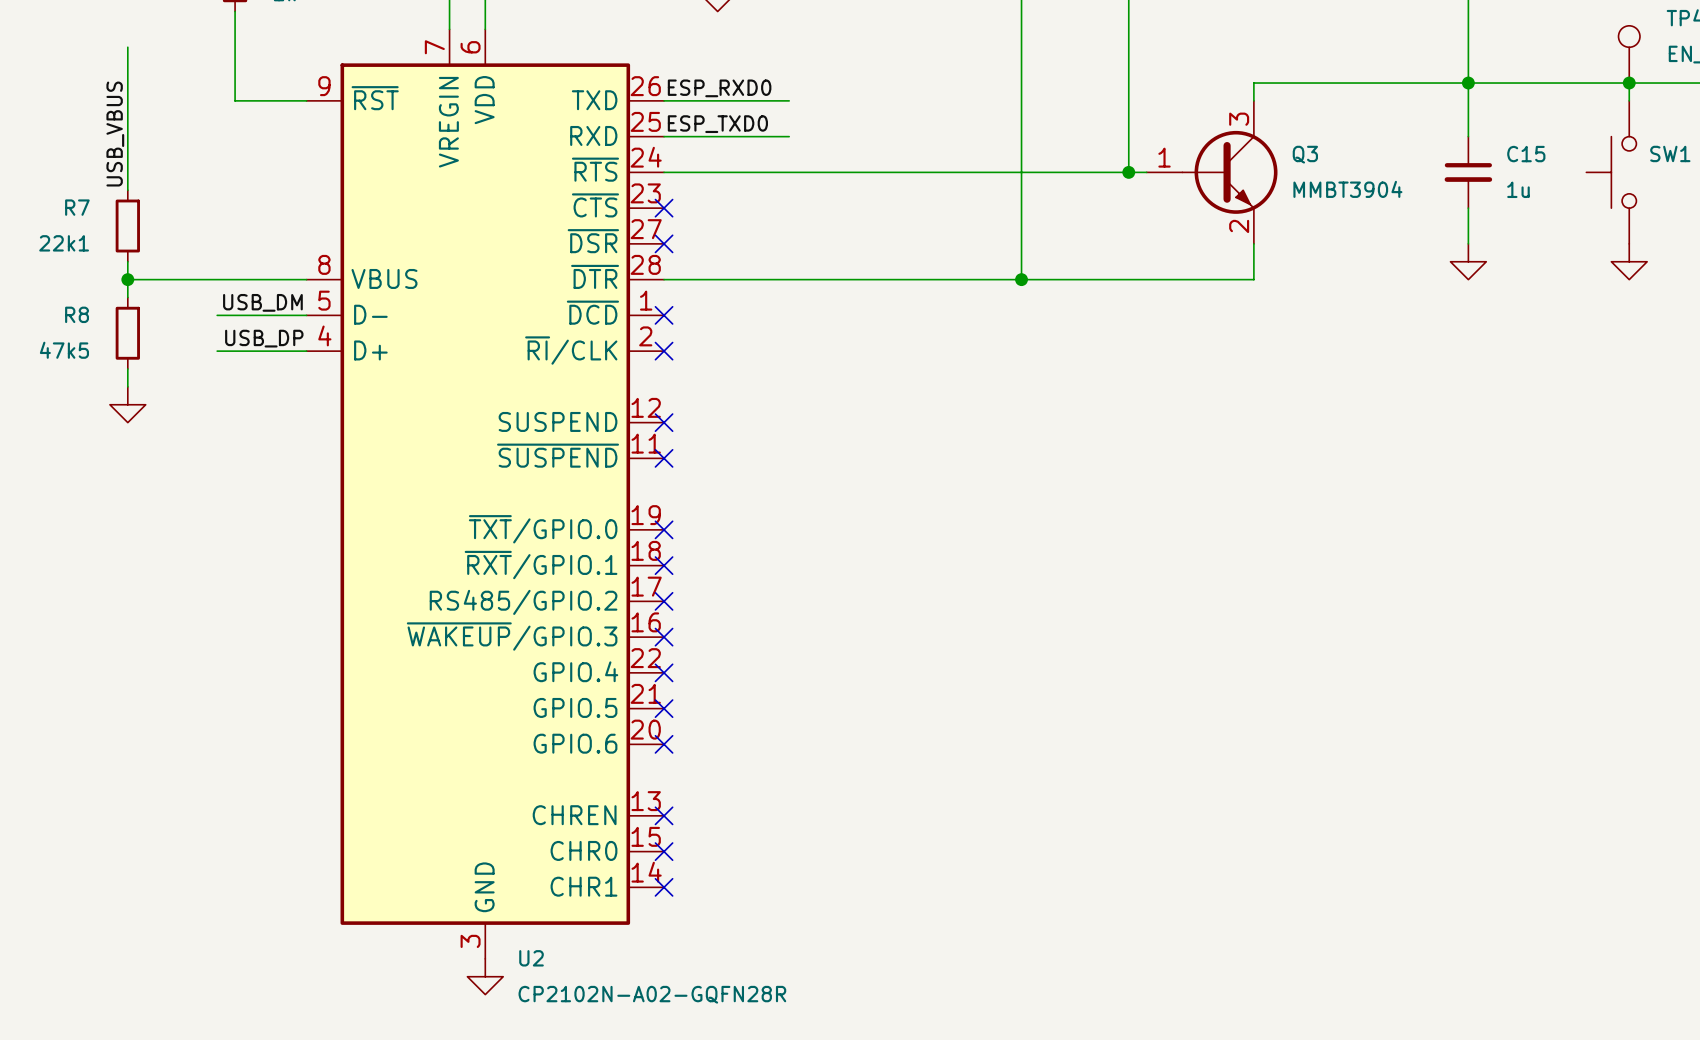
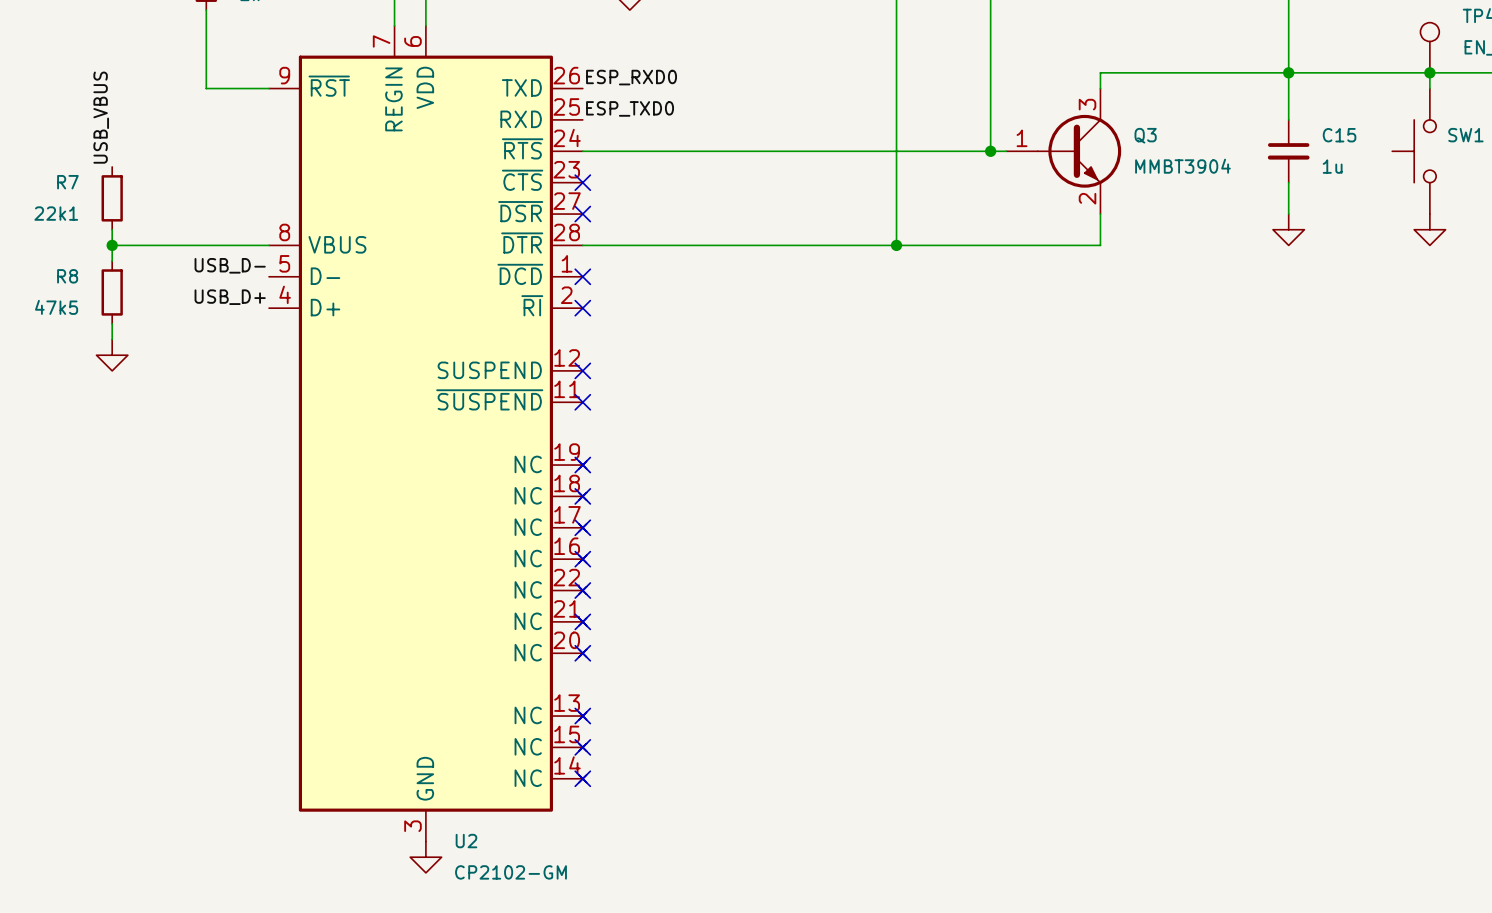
U2 symbol: [306, 29, 665, 959] -> [269, 25, 587, 842]
wire: (127, 47) (127, 190) -> none
wire: (664, 100) (789, 100) -> none
wire: (664, 136) (789, 136) -> none
label: USB_DM (262, 302) -> USB_D- (230, 265)
wire: (217, 315) (306, 315) -> none
label: USB_DP (264, 338) -> USB_D+ (230, 297)
wire: (217, 351) (306, 351) -> none
U2 value: CP2102N-A02-GQFN28R (652, 994) -> CP2102-GM (511, 872)

